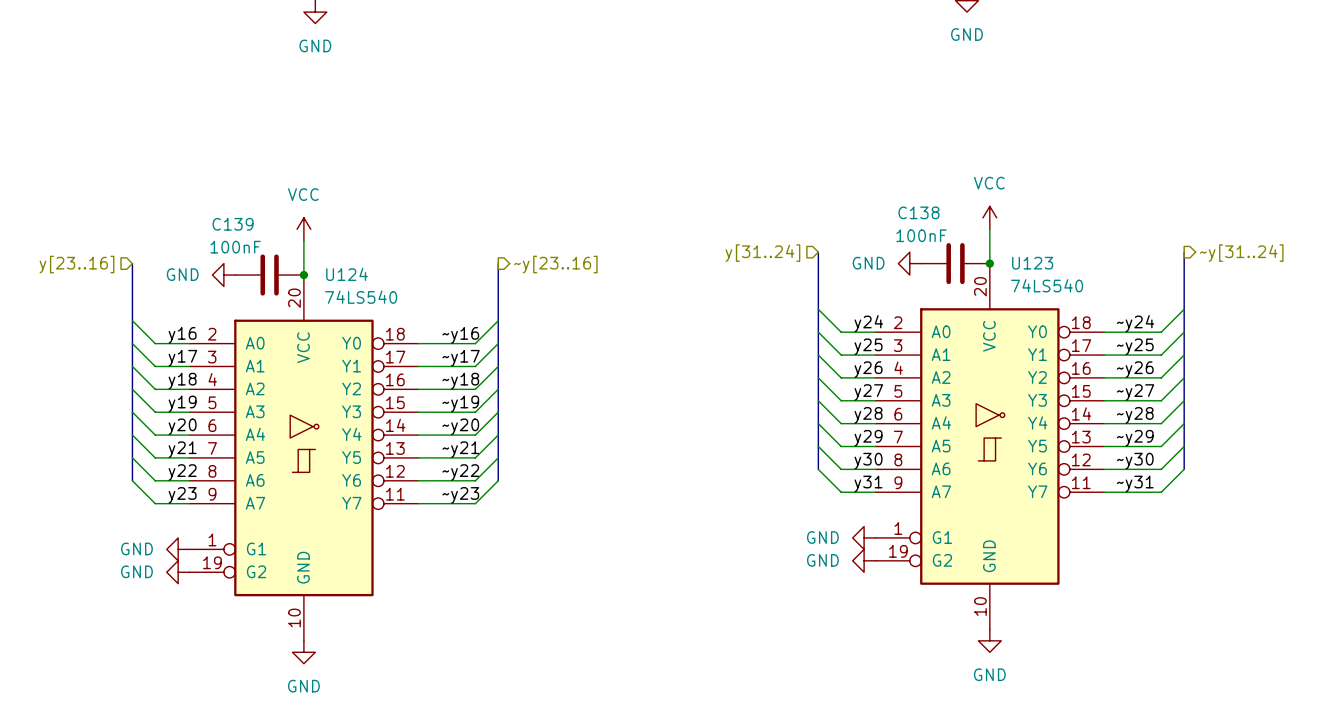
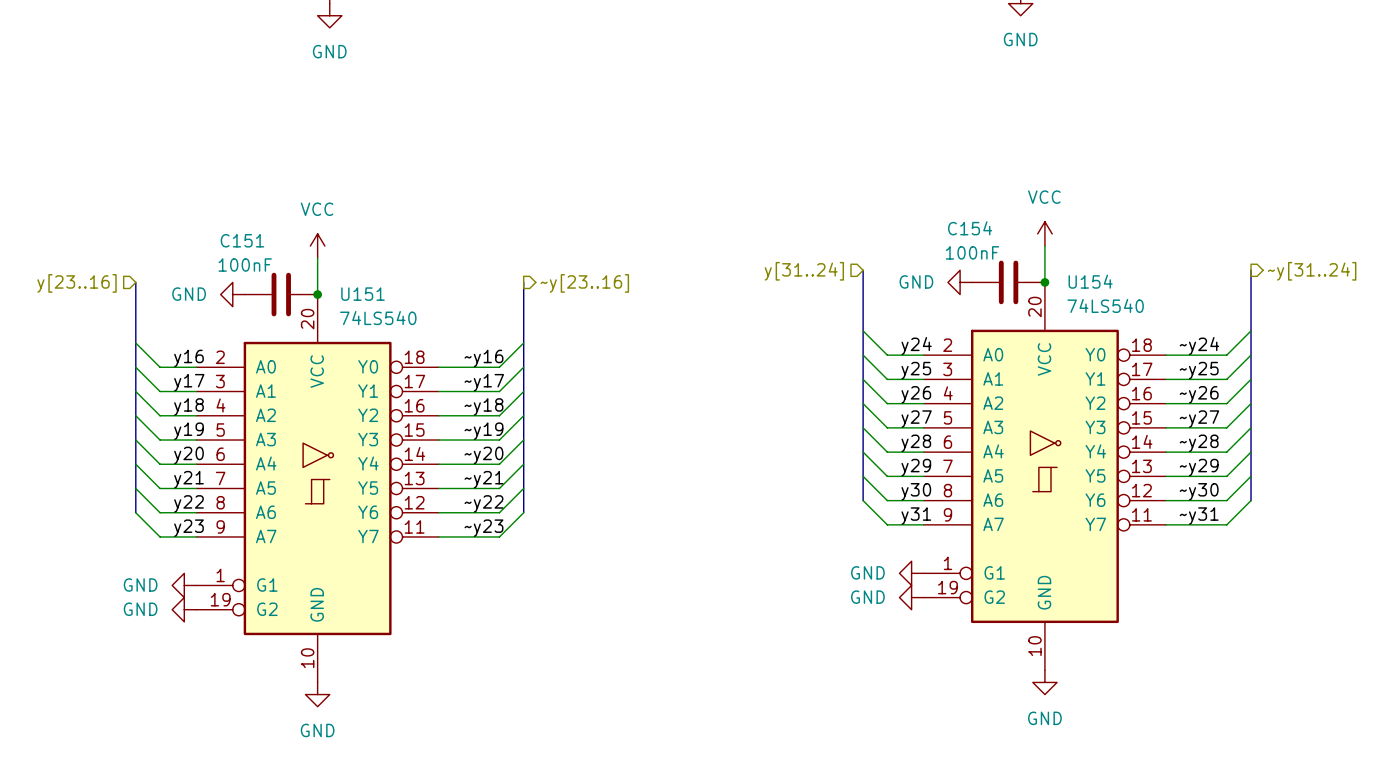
C138 name: C138 (918, 212) -> C154 (970, 228)
C139 name: C139 (233, 224) -> C151 (242, 240)
U123 name: U123 (1032, 263) -> U154 (1090, 281)
U124 name: U124 (346, 274) -> U151 (363, 294)

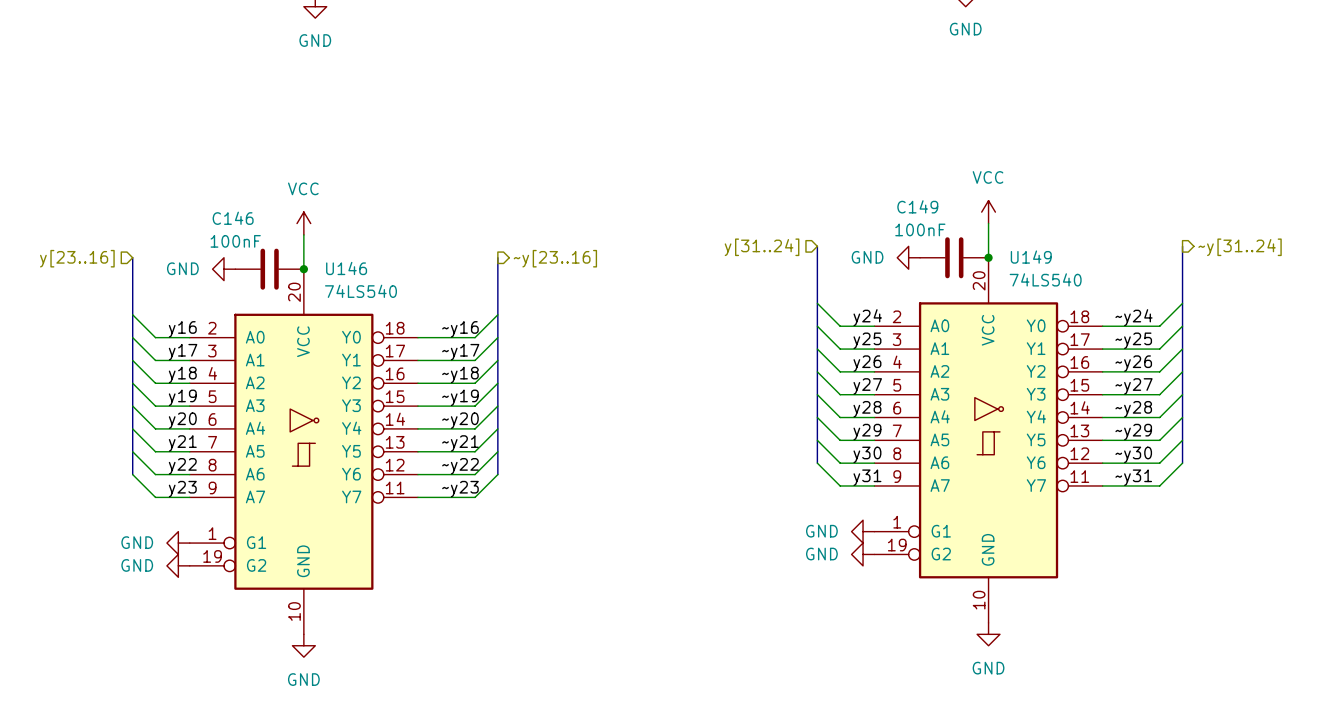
C154 name: C154 (970, 228) -> C149 (917, 206)
C151 name: C151 (242, 240) -> C146 (233, 218)
U154 name: U154 (1090, 281) -> U149 (1031, 257)
U151 name: U151 (363, 294) -> U146 (346, 268)

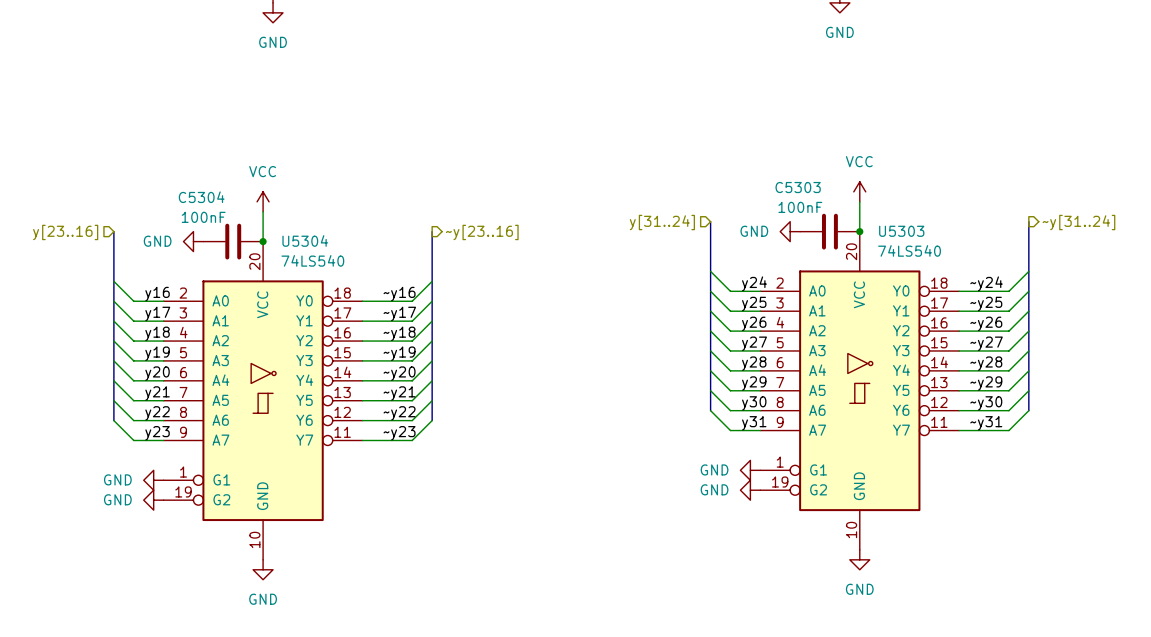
C149 name: C149 (917, 206) -> C5303 (798, 187)
C146 name: C146 (233, 218) -> C5304 (201, 197)
U149 name: U149 (1031, 257) -> U5303 (901, 231)
U146 name: U146 (346, 268) -> U5304 (305, 240)

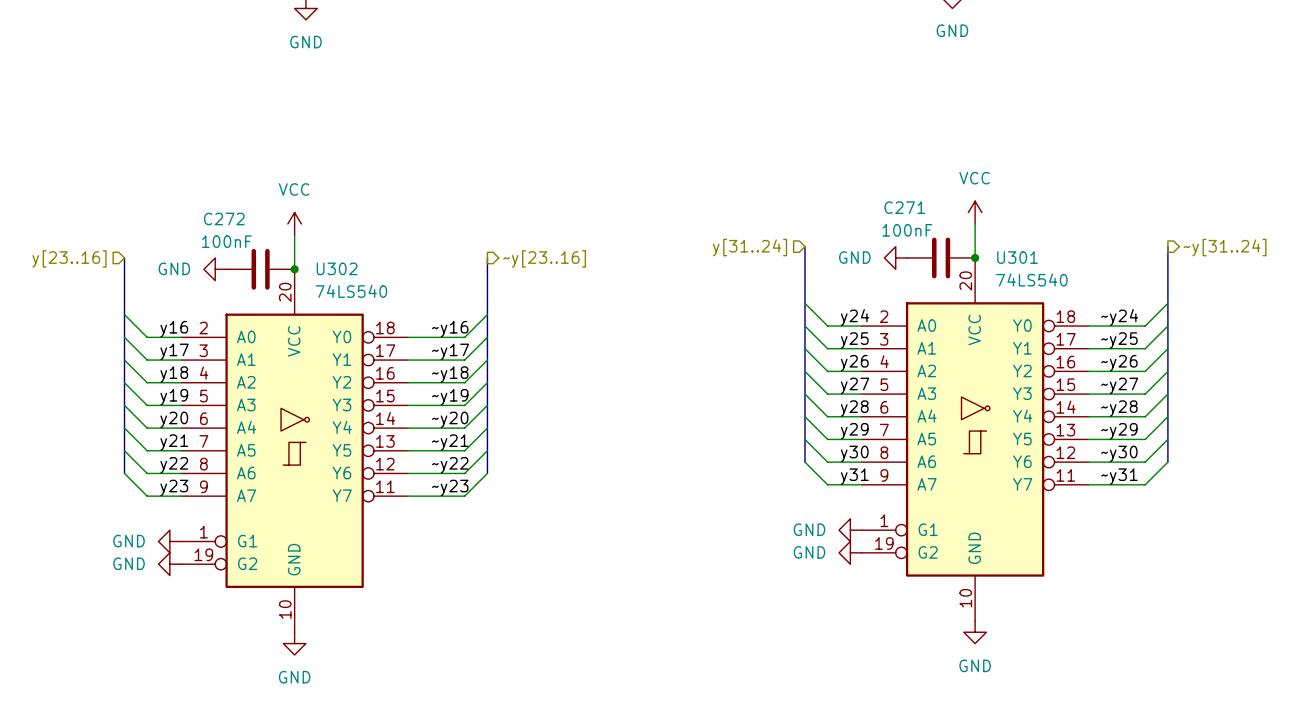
C5303 name: C5303 (798, 187) -> C271 (904, 207)
C5304 name: C5304 (201, 197) -> C272 (224, 218)
U5303 name: U5303 (901, 231) -> U301 (1017, 257)
U5304 name: U5304 (305, 240) -> U302 (337, 268)

